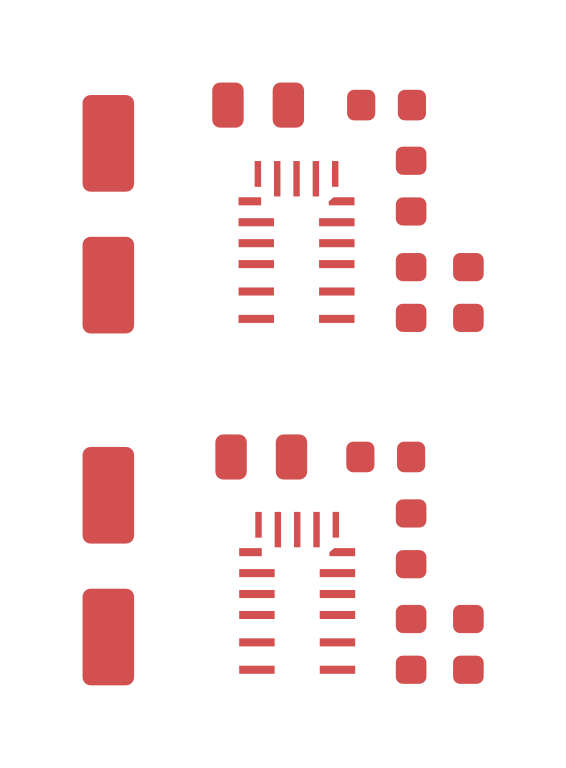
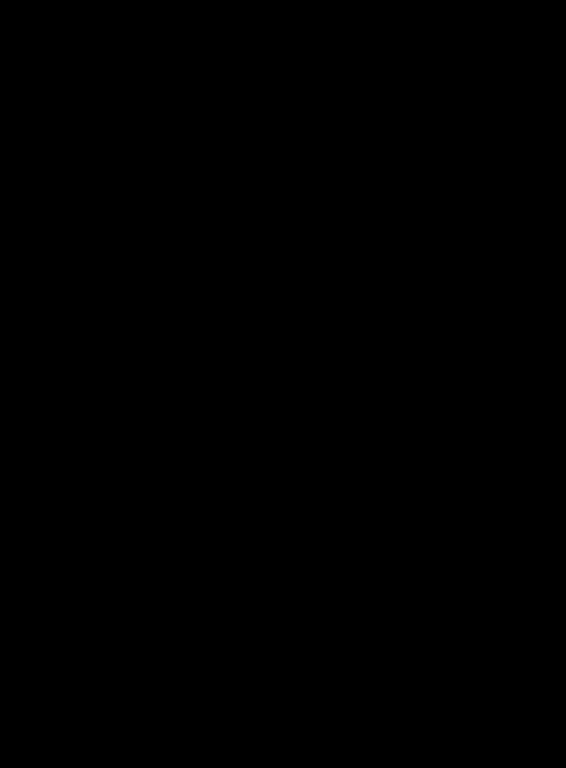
part: (258, 105) -> none
part: (386, 105) -> none
part: (411, 186) -> none
part: (108, 214) -> none
part: (296, 241) -> none
part: (411, 292) -> none
part: (468, 292) -> none
part: (261, 456) -> none
part: (385, 456) -> none
part: (411, 538) -> none
part: (108, 566) -> none
part: (297, 592) -> none
part: (411, 644) -> none
part: (468, 644) -> none

